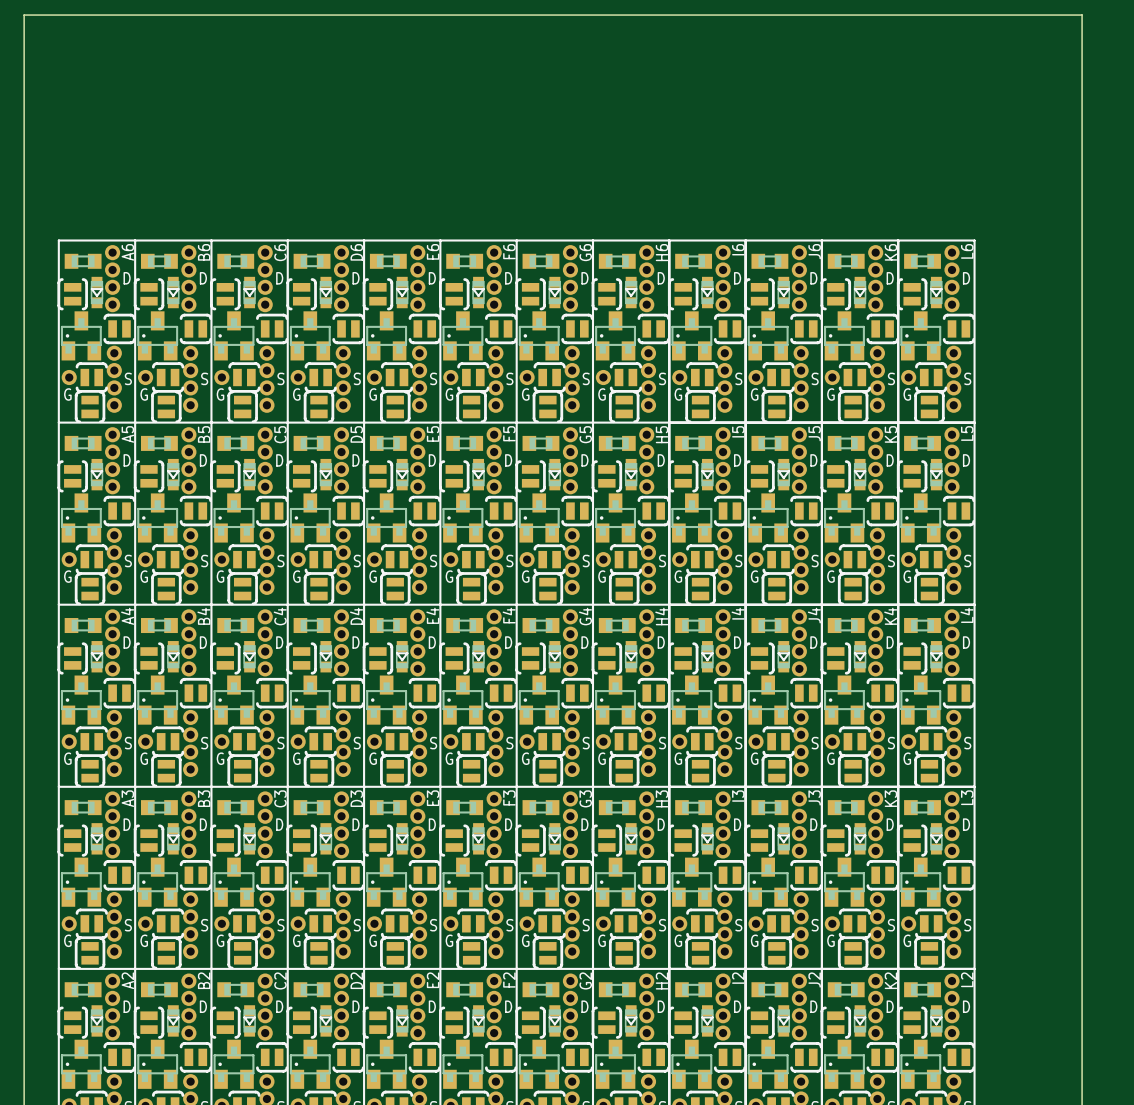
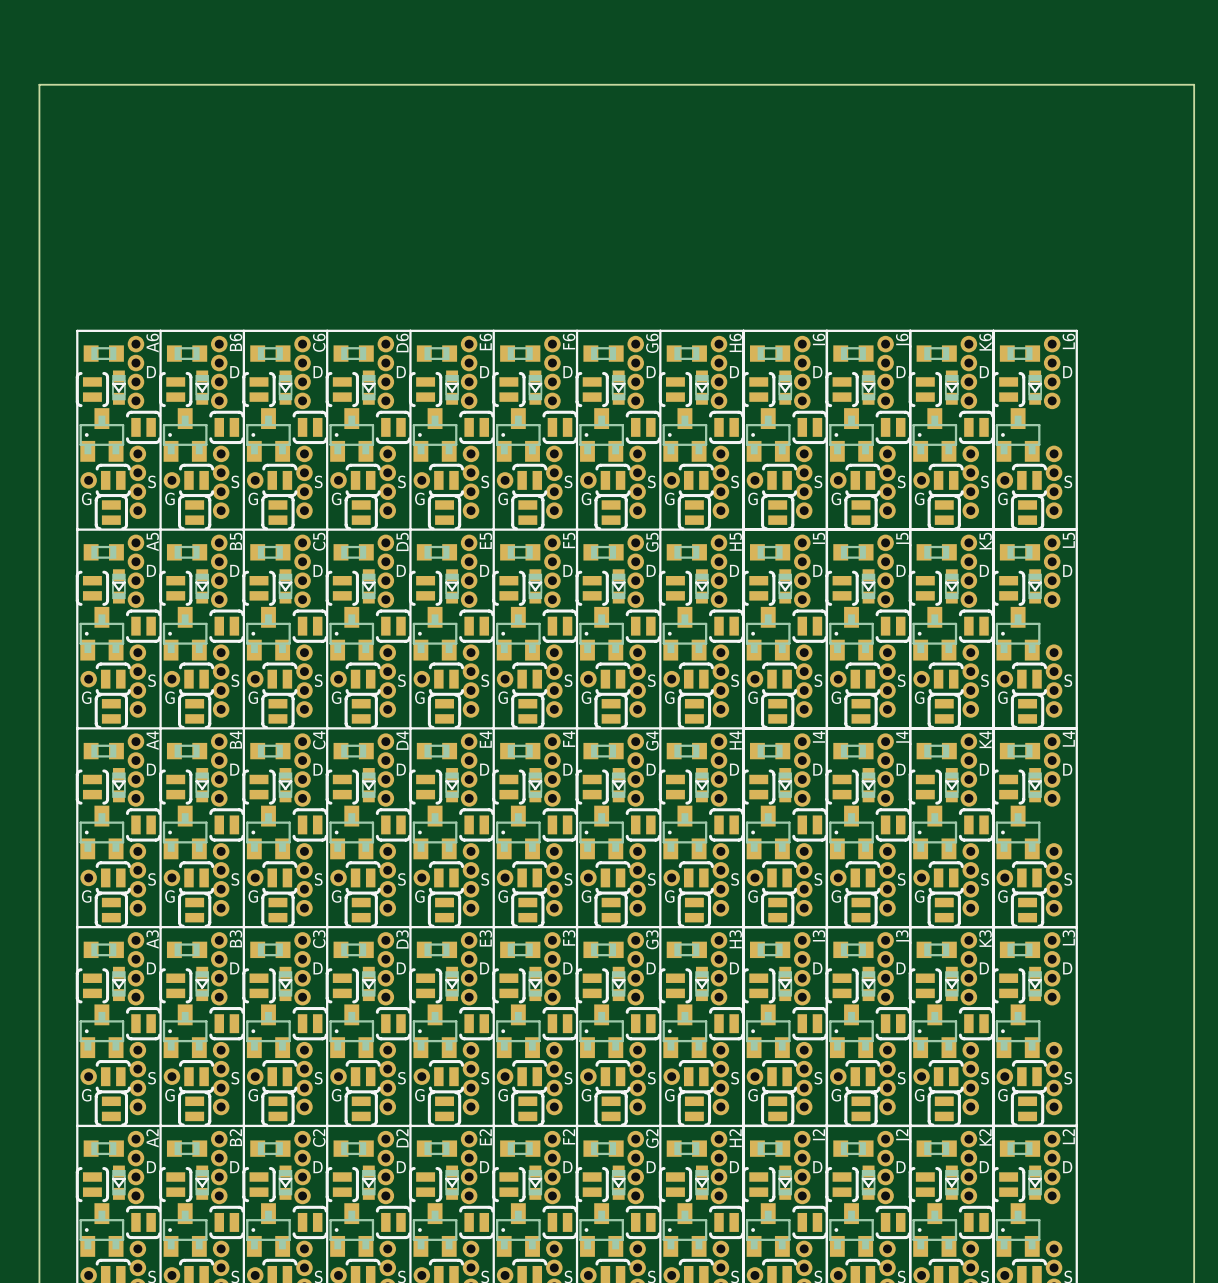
part: (958, 328) -> none
part: (958, 511) -> none
part: (958, 693) -> none
part: (958, 875) -> none
part: (958, 1057) -> none

